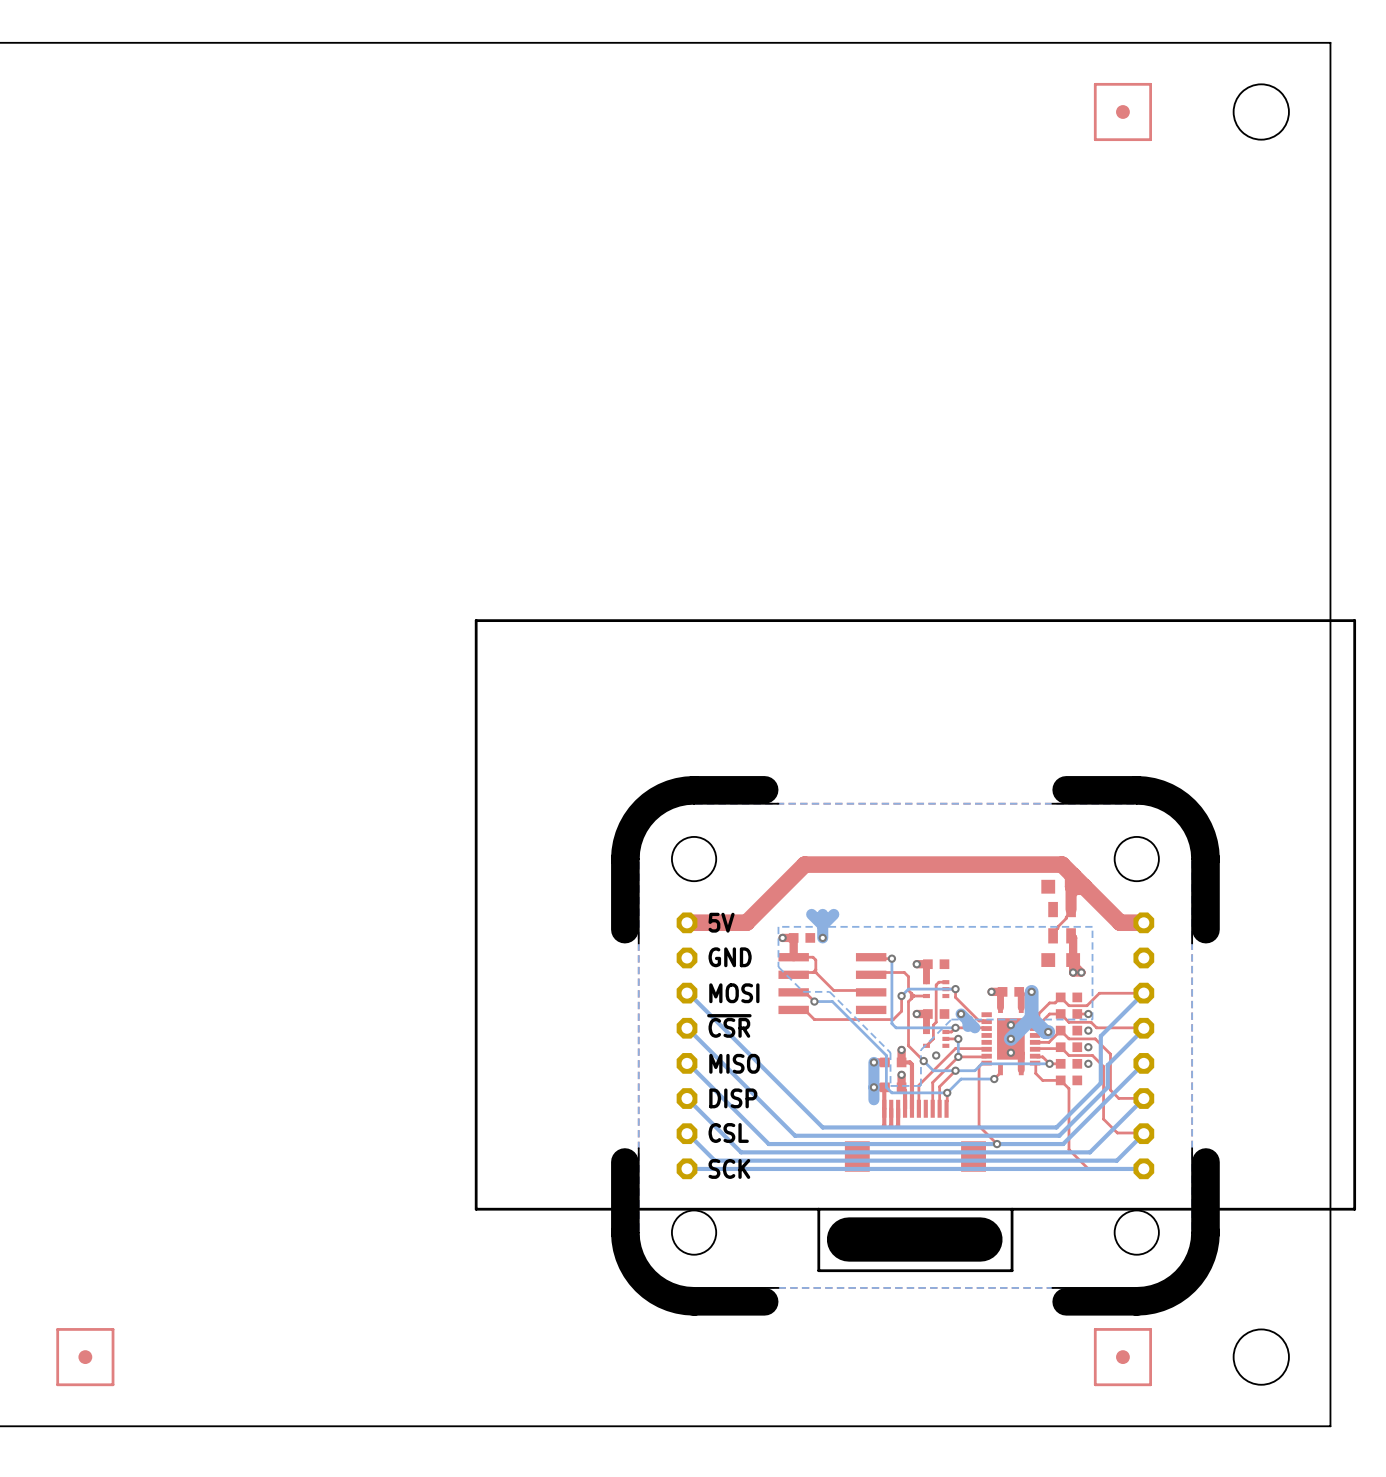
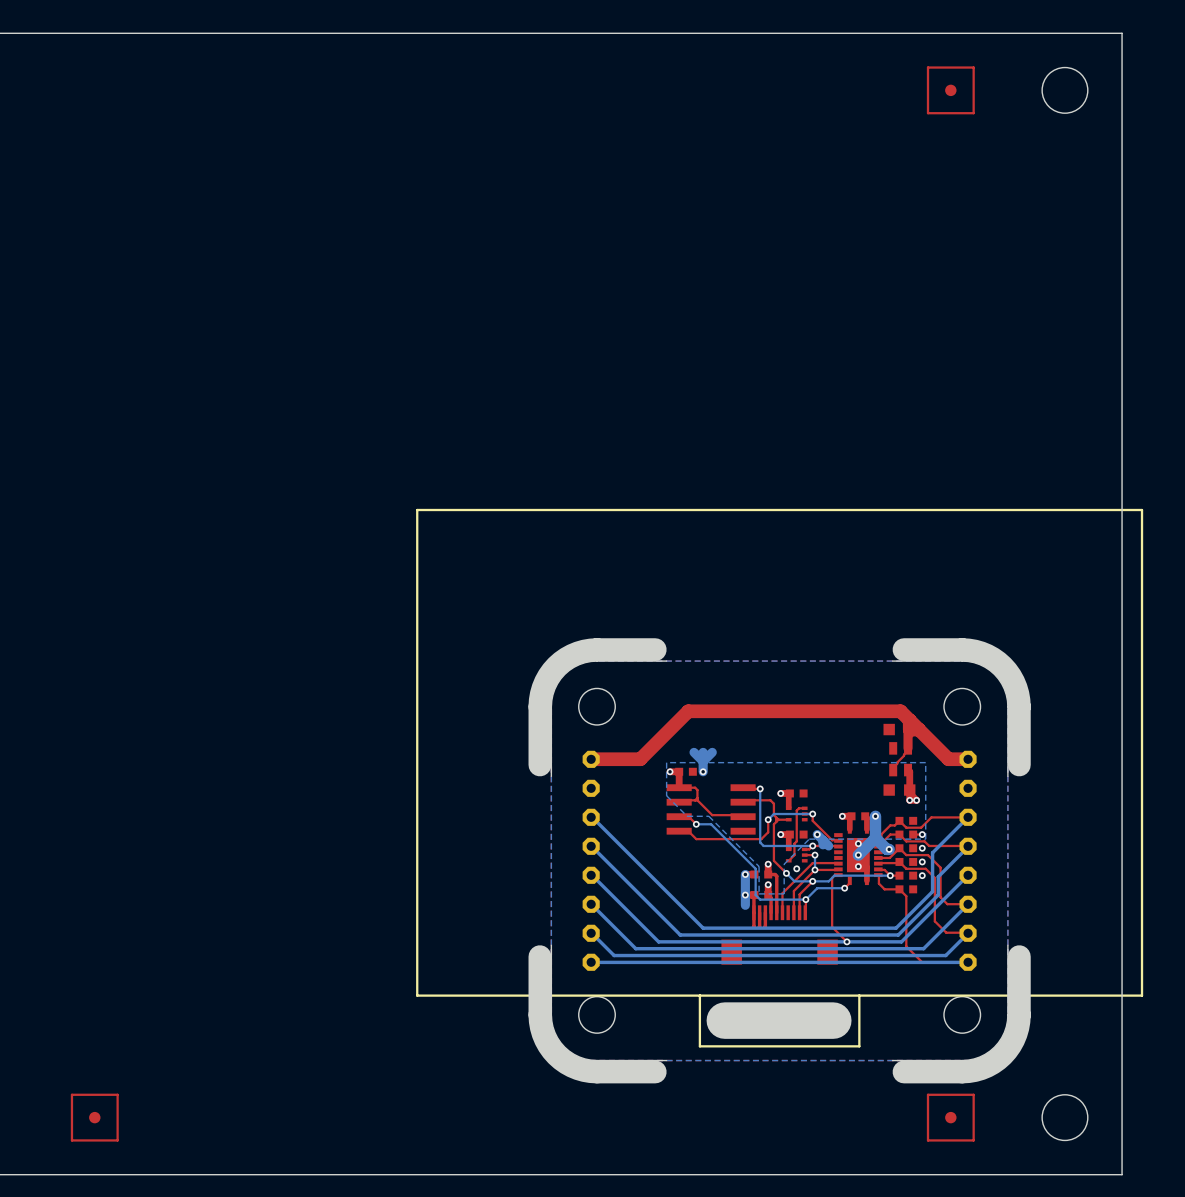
text: 5V (721, 922) -> none
text: GND (730, 957) -> none
text: MOSI (734, 993) -> none
text: ~{CSR} (729, 1025) -> none
text: MISO (734, 1063) -> none
text: DISP (733, 1098) -> none
text: CSL (728, 1132) -> none
text: SCK (729, 1168) -> none

